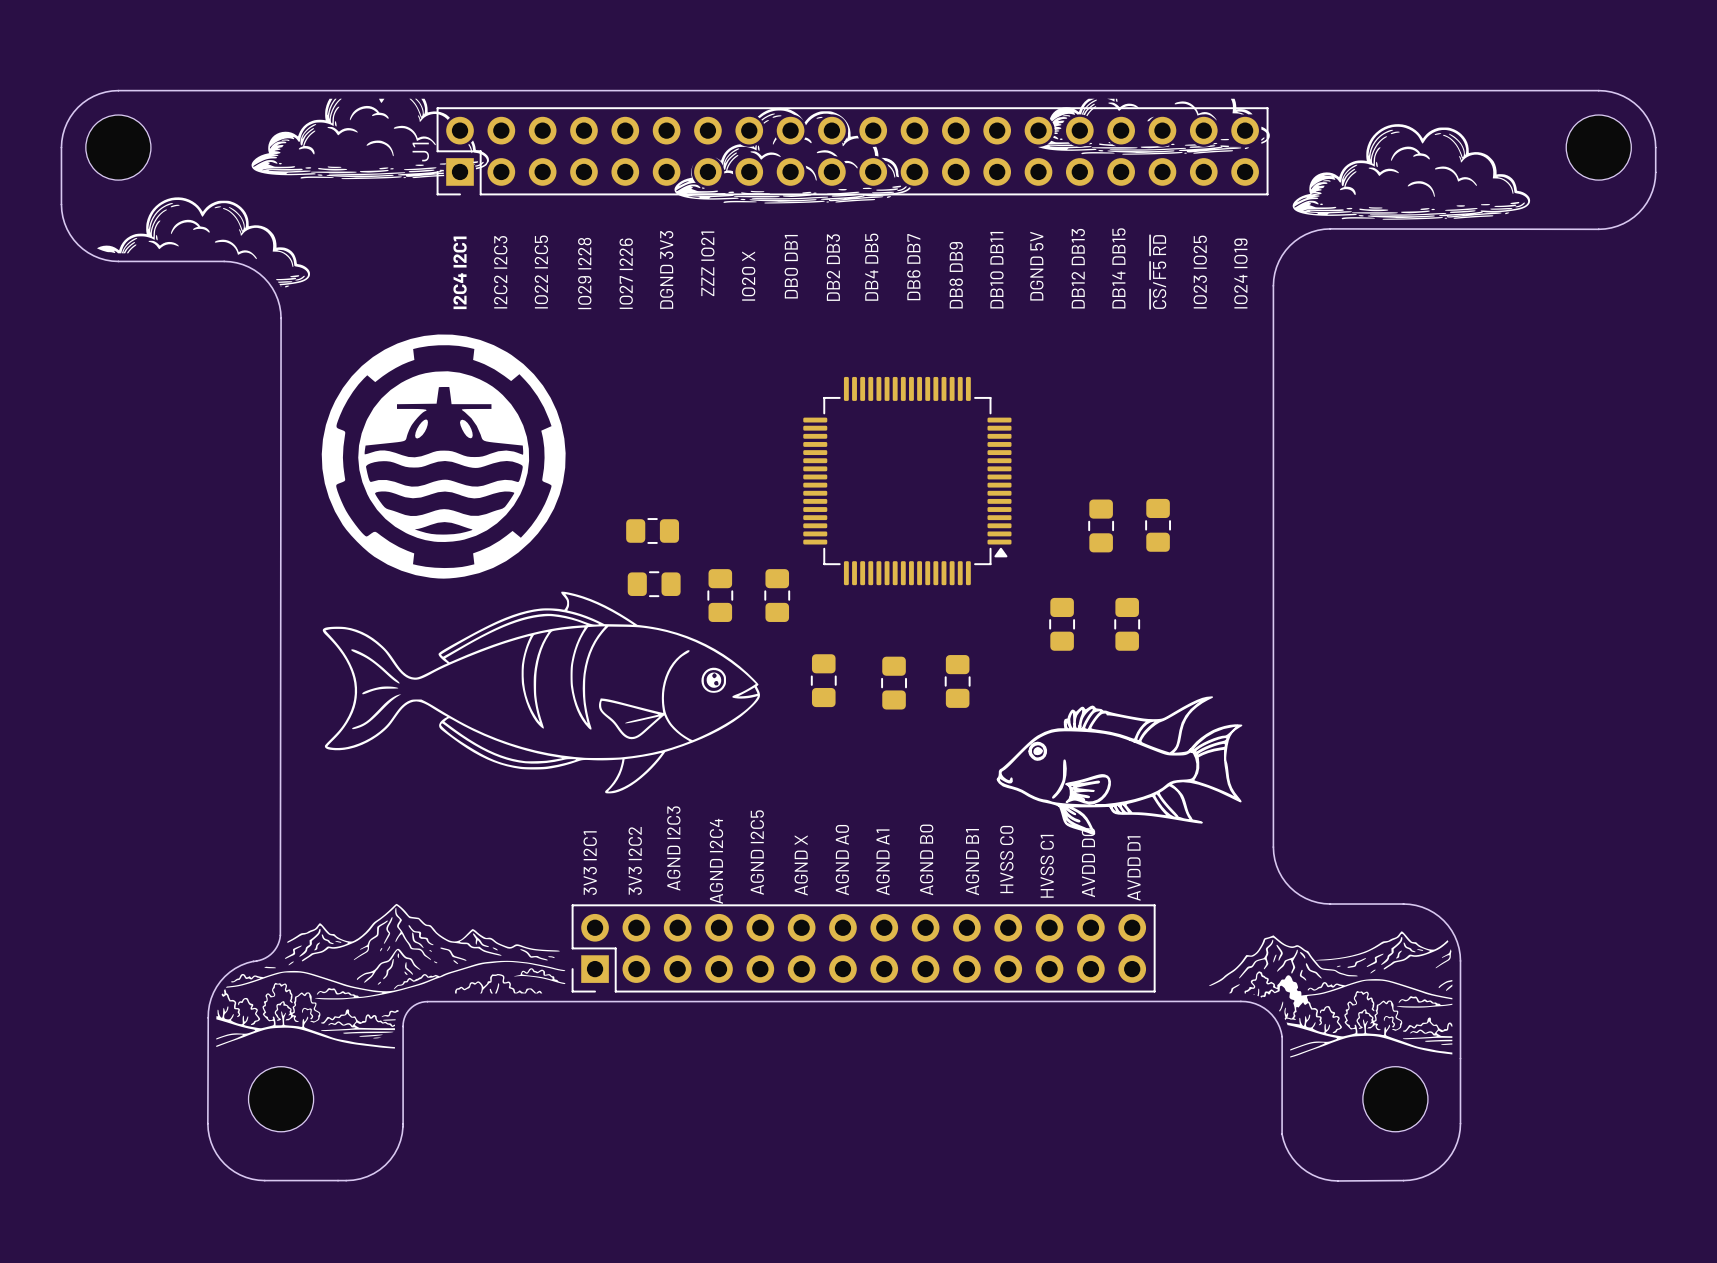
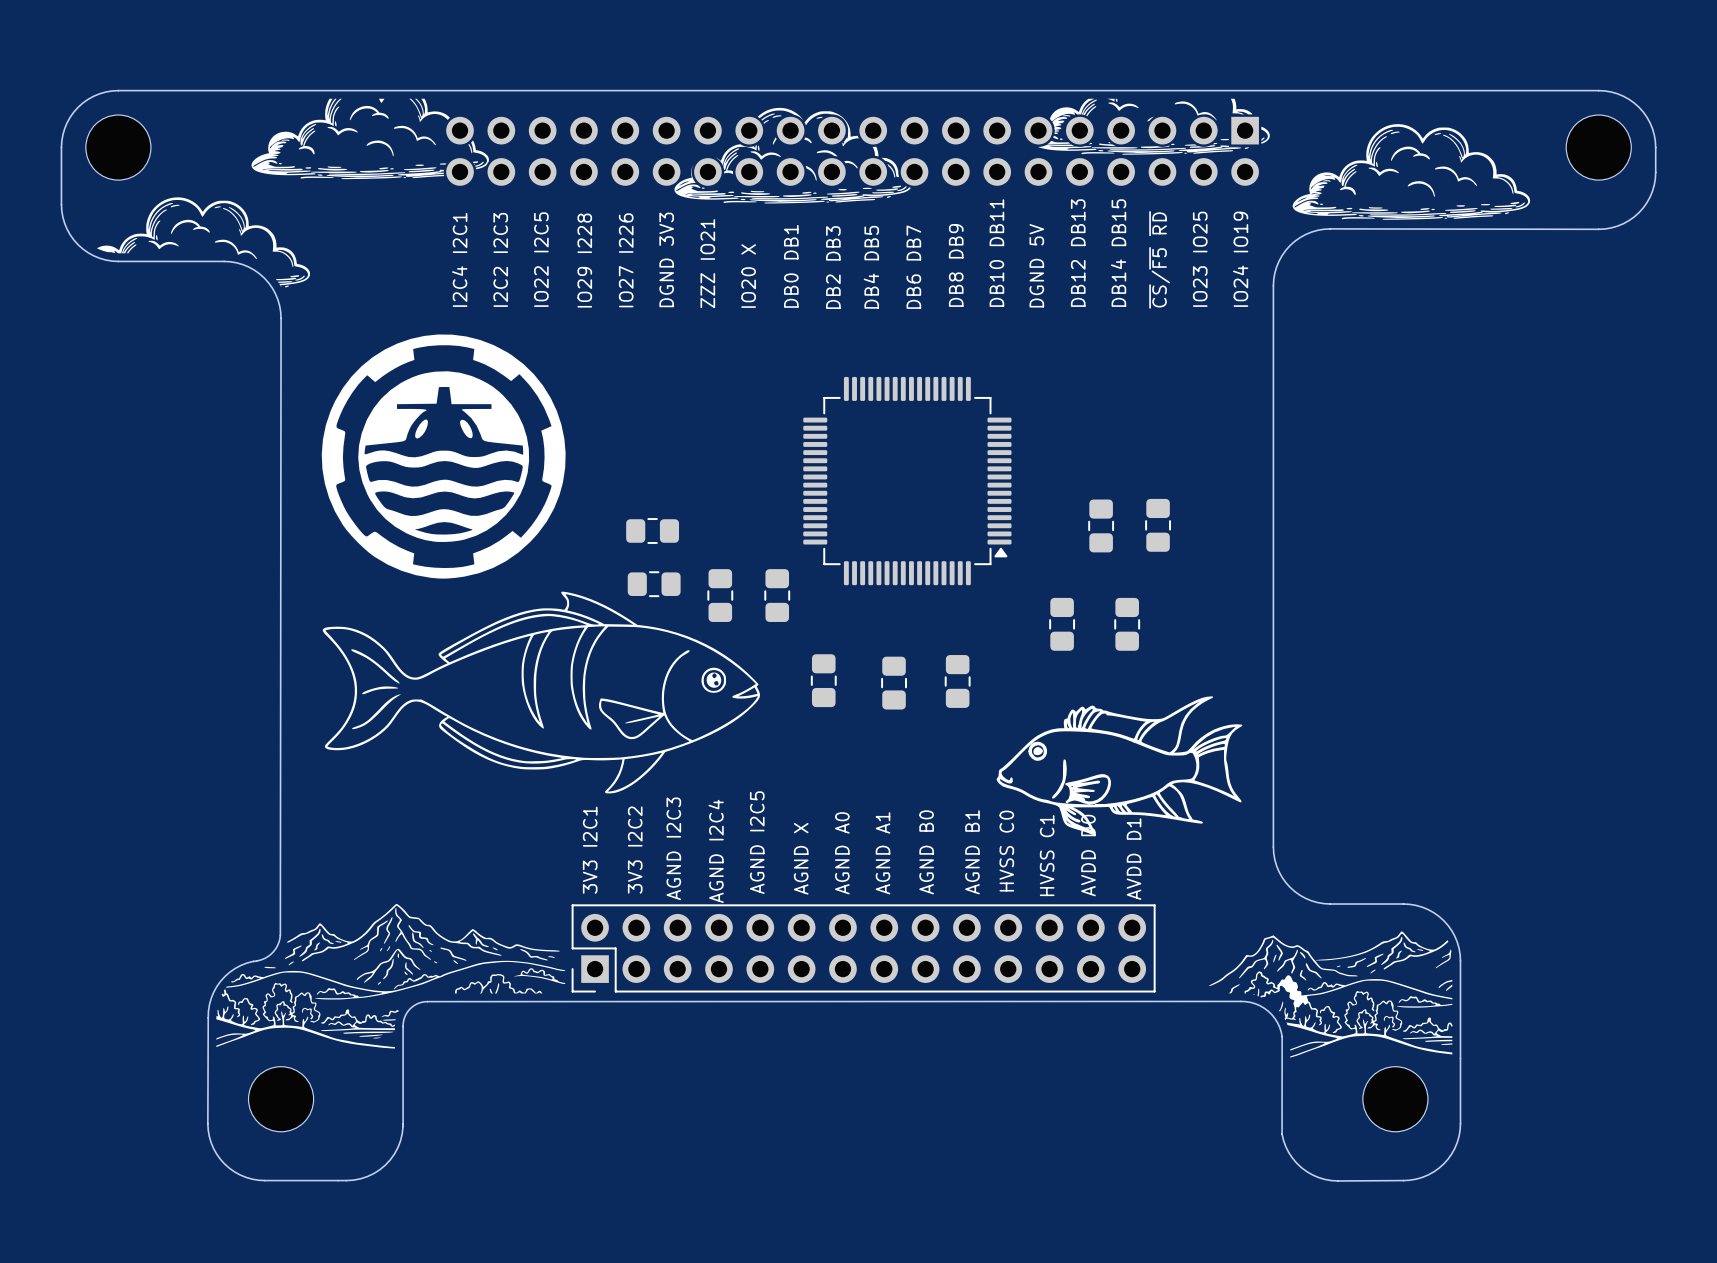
J1: (852, 151) -> none
part: none -> (852, 151)

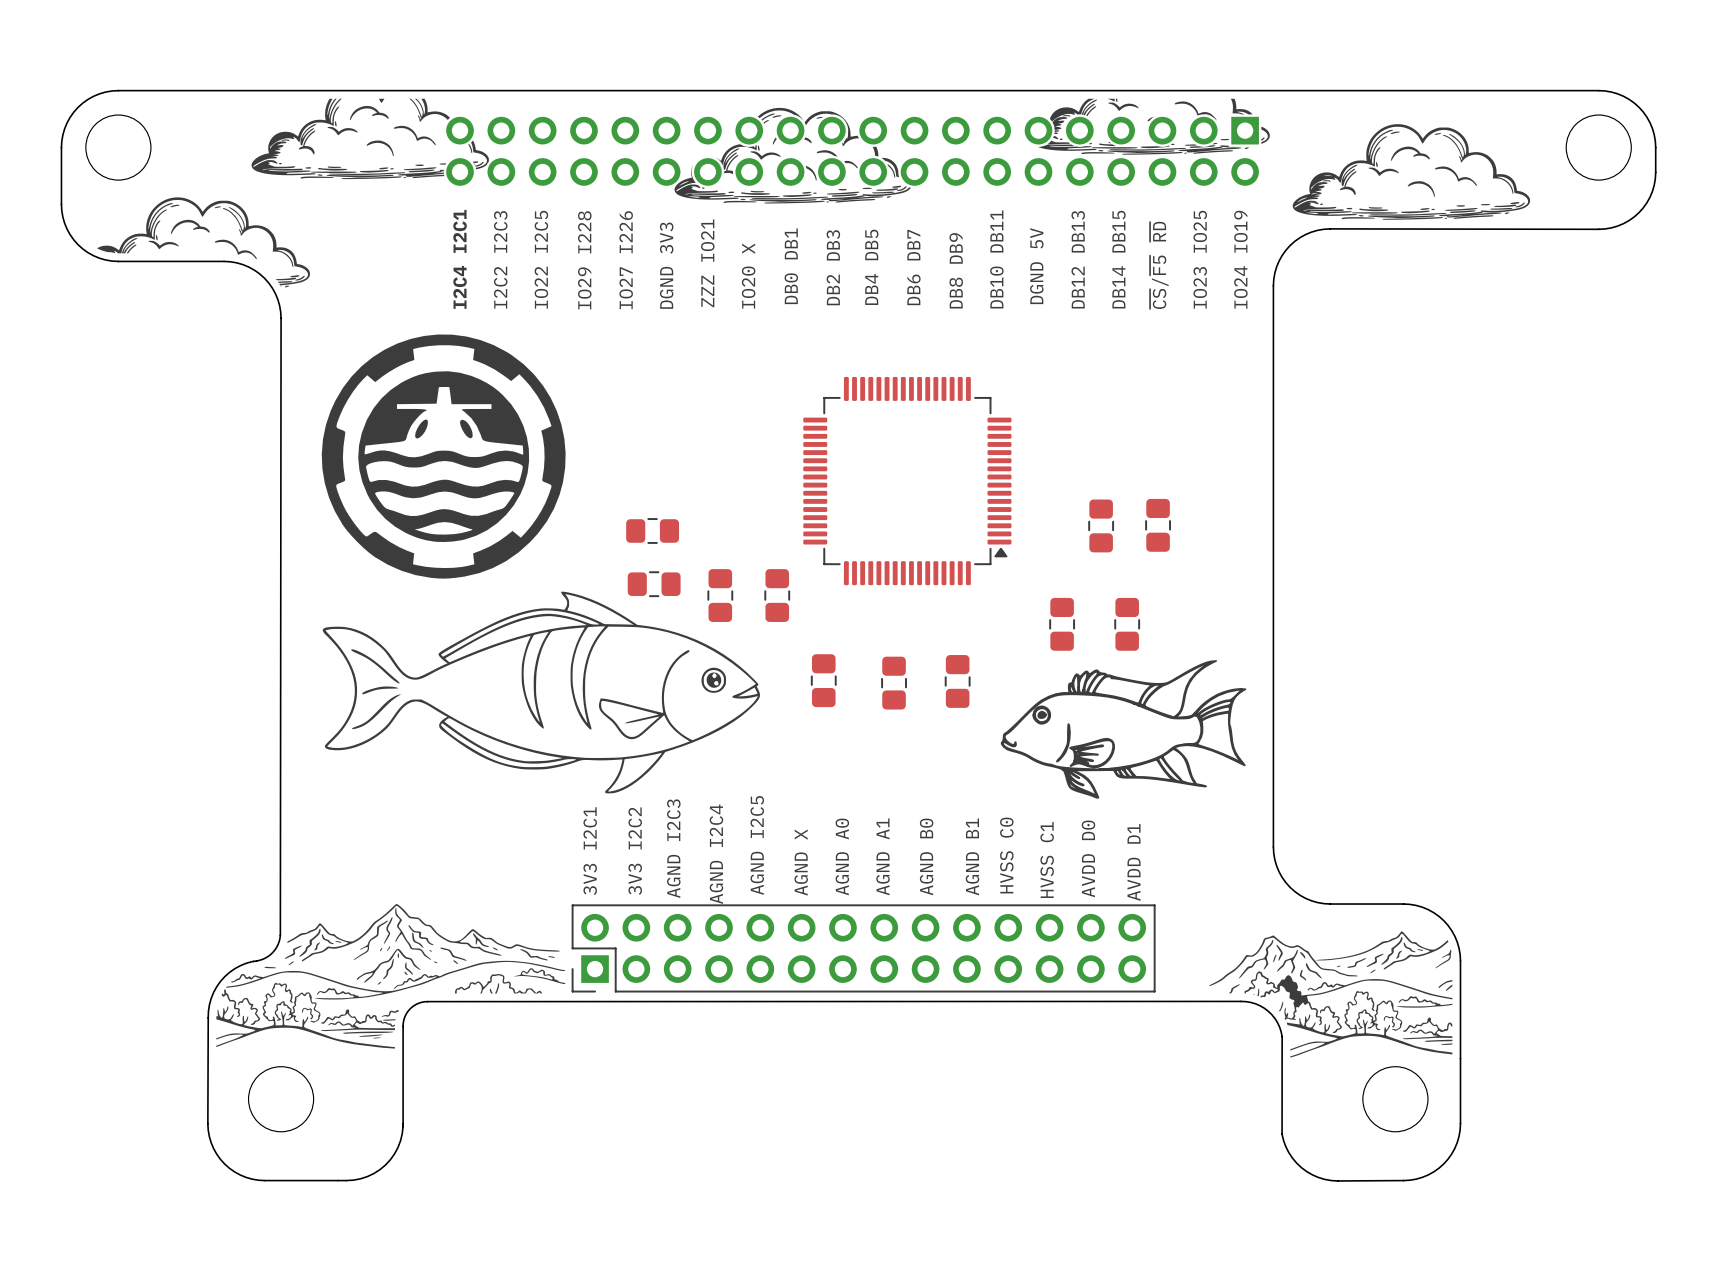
drawing position: (1119, 765) -> (1123, 729)

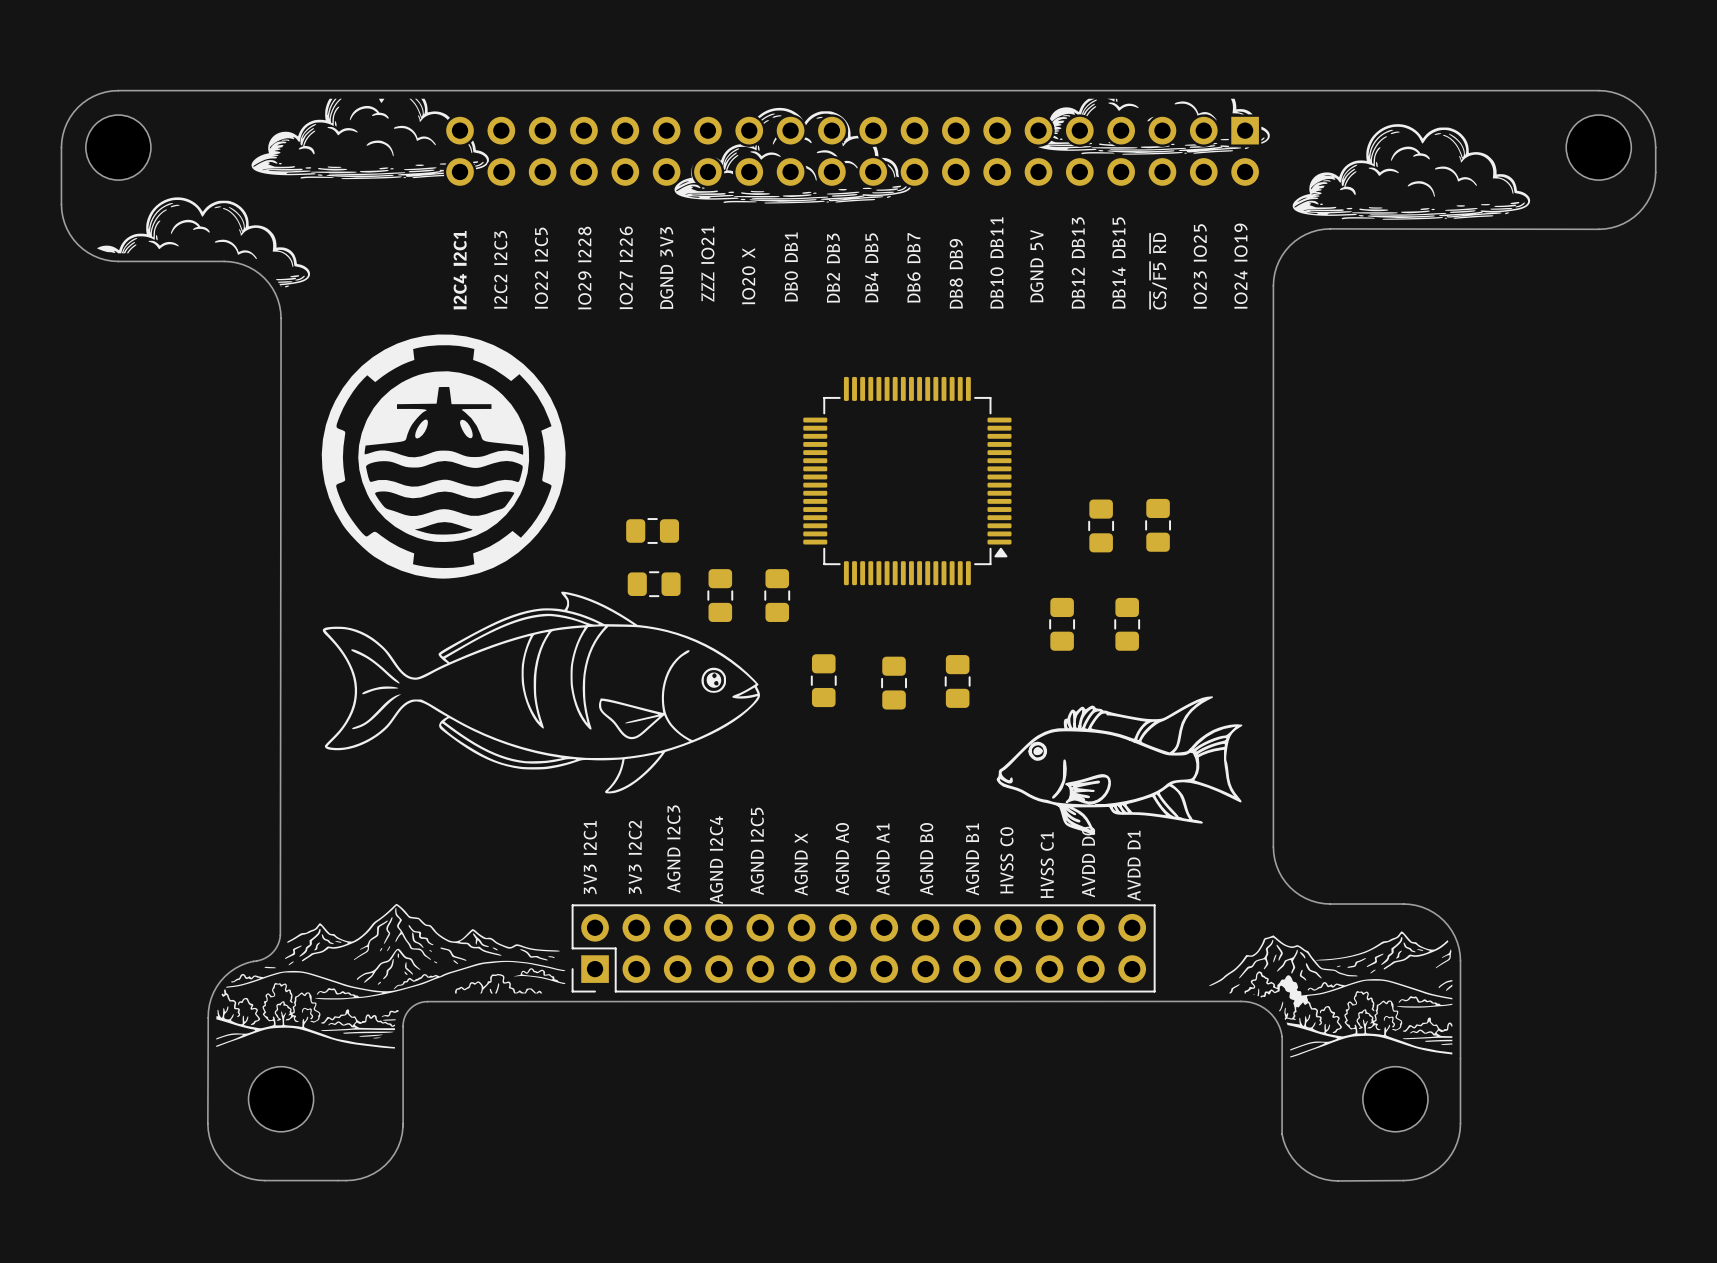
drawing position: (1123, 729) -> (1119, 765)

